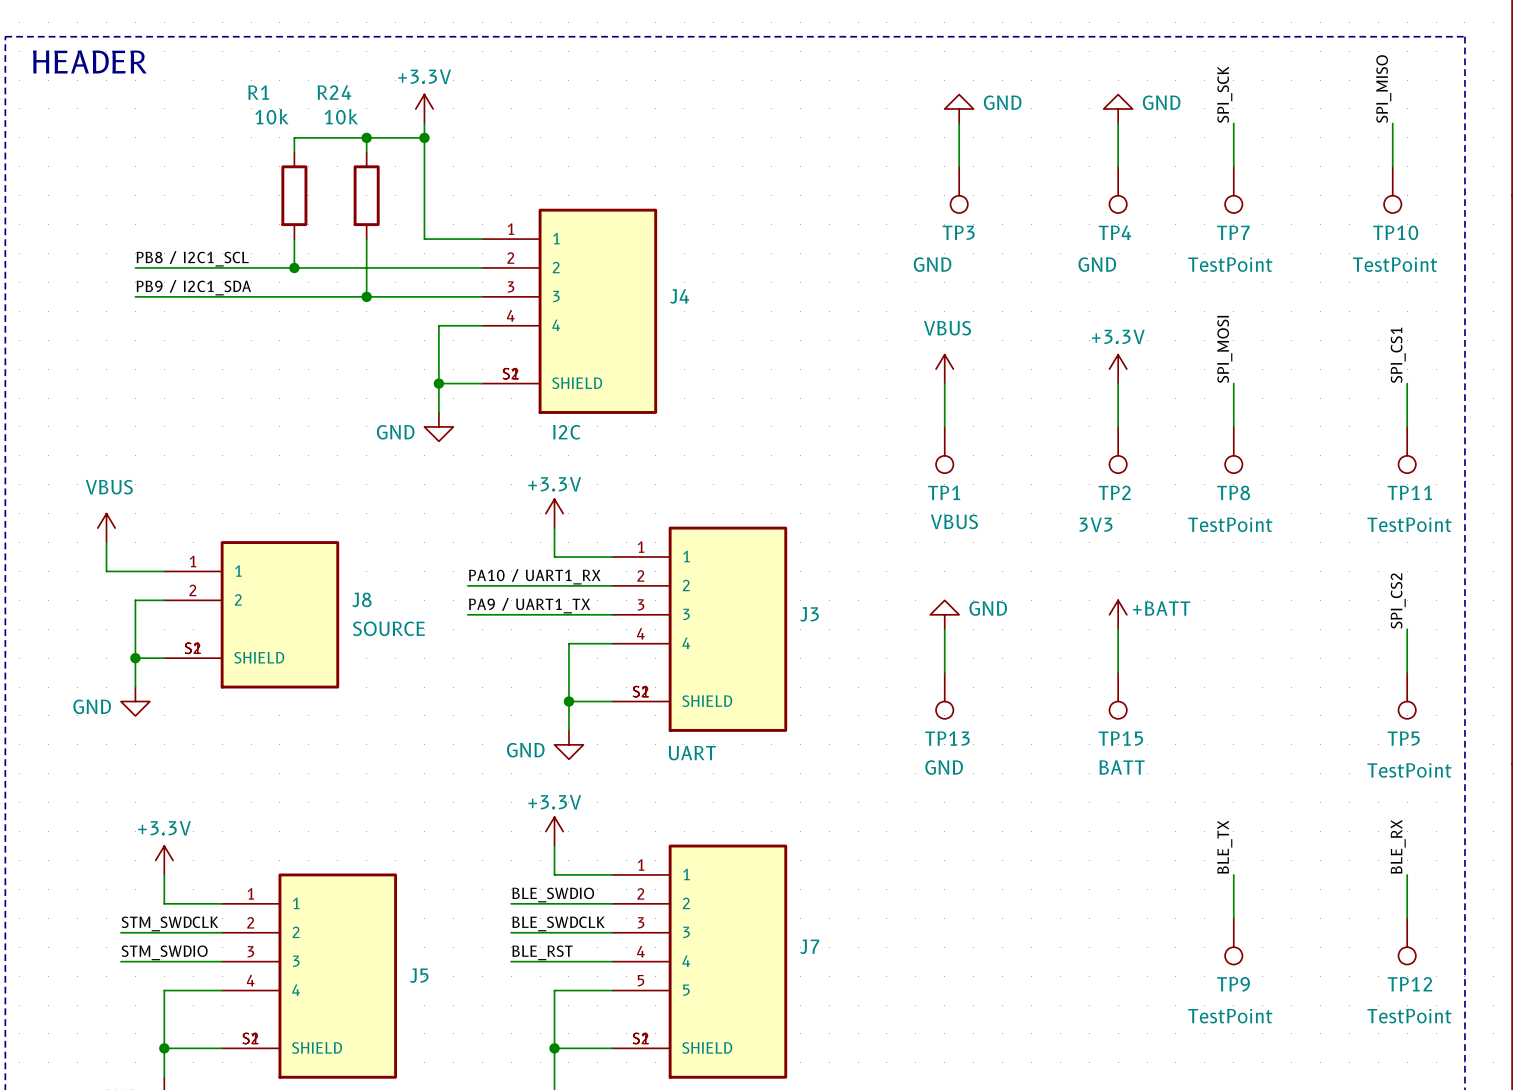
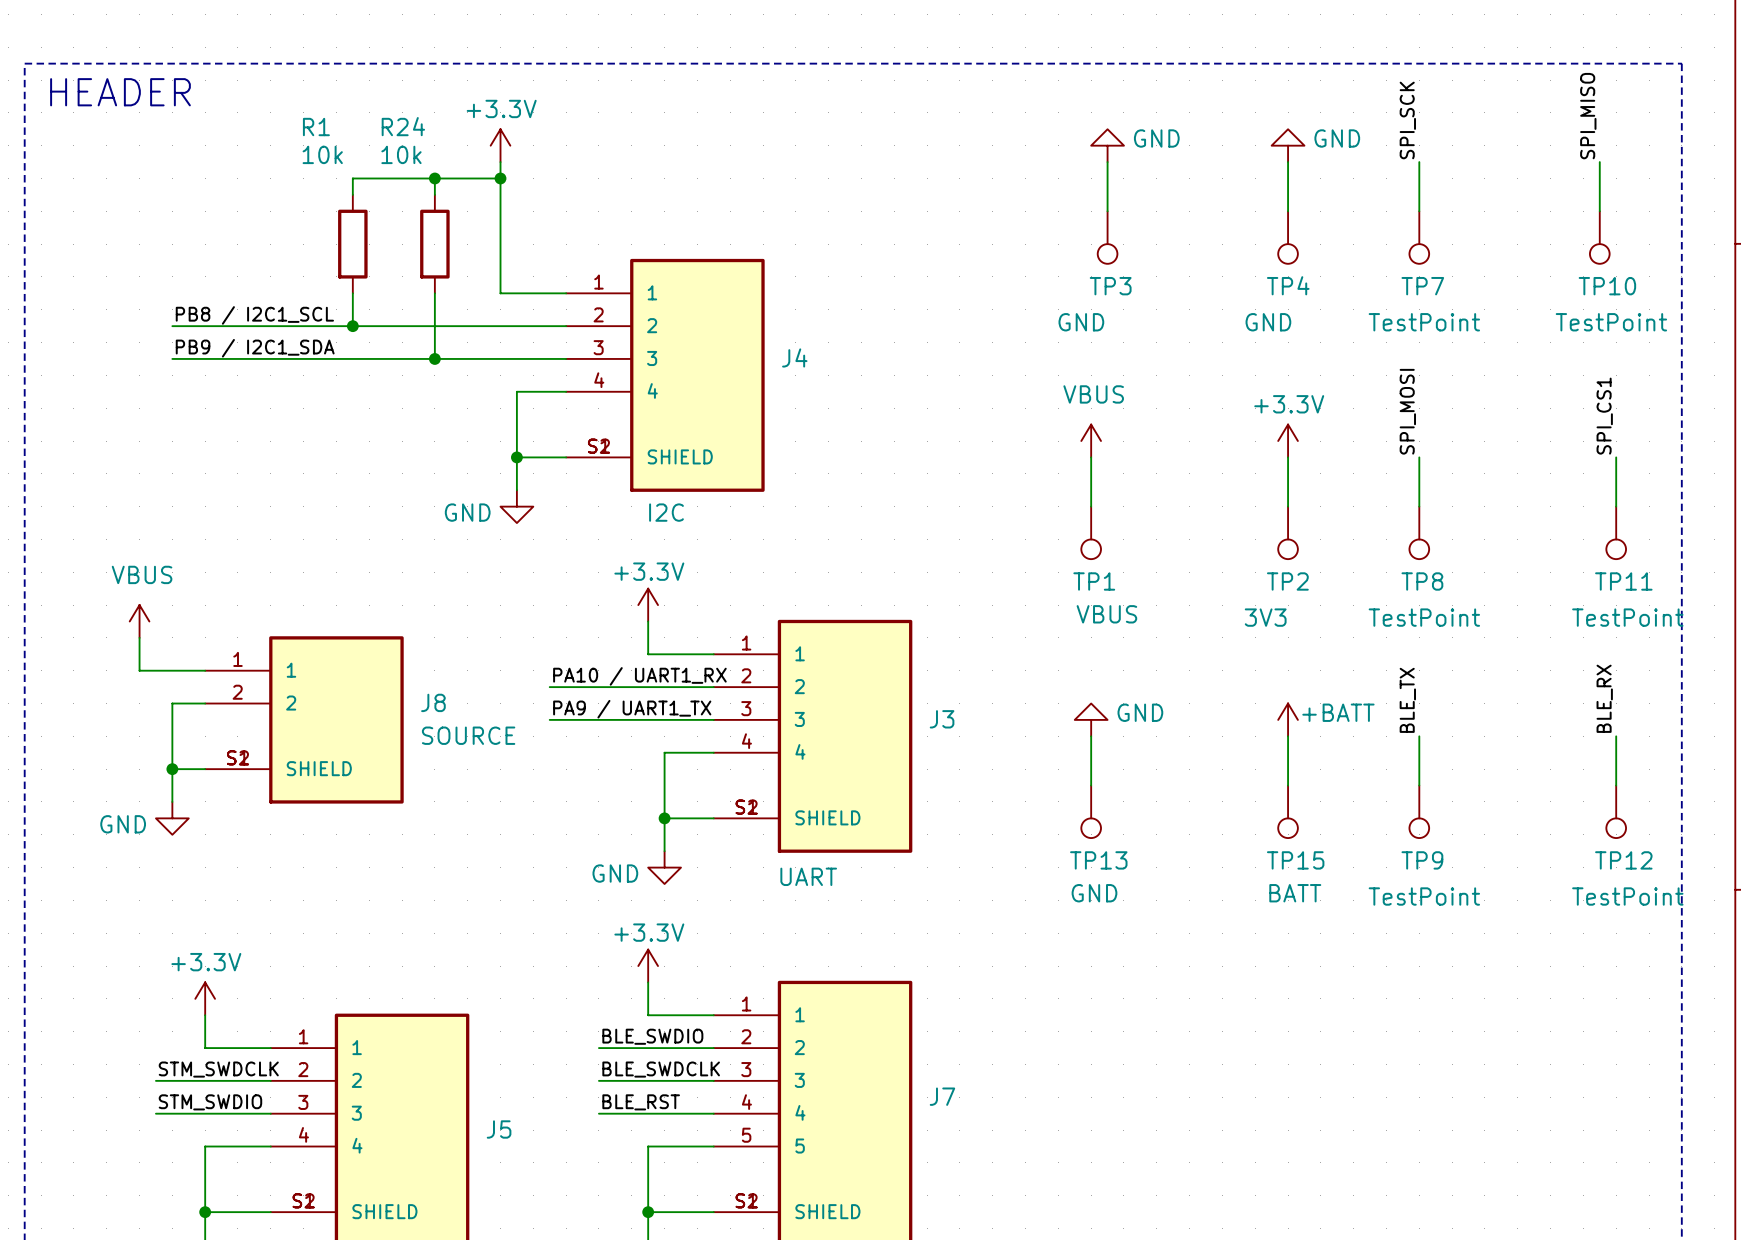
label: SPI_CS2 (1398, 600) -> BLE_RX (1604, 698)
TP5 name: TP5 (1403, 738) -> TP12 (1623, 860)
label: BLE_RX (1398, 846) -> none
label position: BLE_TX (1224, 847) -> BLE_TX (1407, 700)
wire: (1233, 874) (1233, 918) -> (1419, 736) (1419, 785)
wire: (1407, 874) (1407, 918) -> none
TP9 position: (1233, 941) -> (1419, 811)
TP12: TestPoint (1407, 941) -> none

